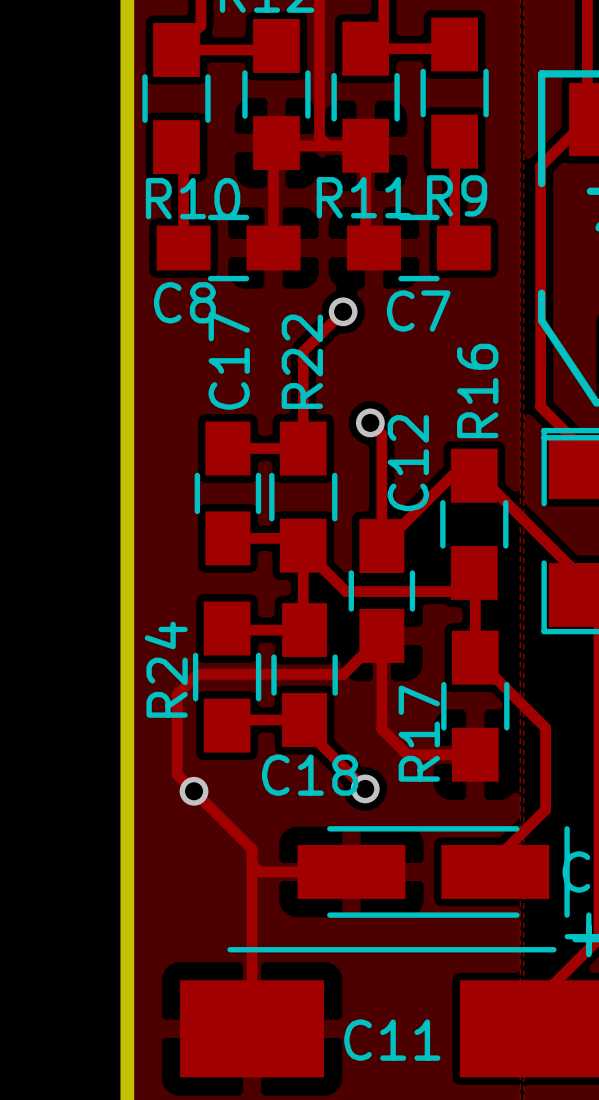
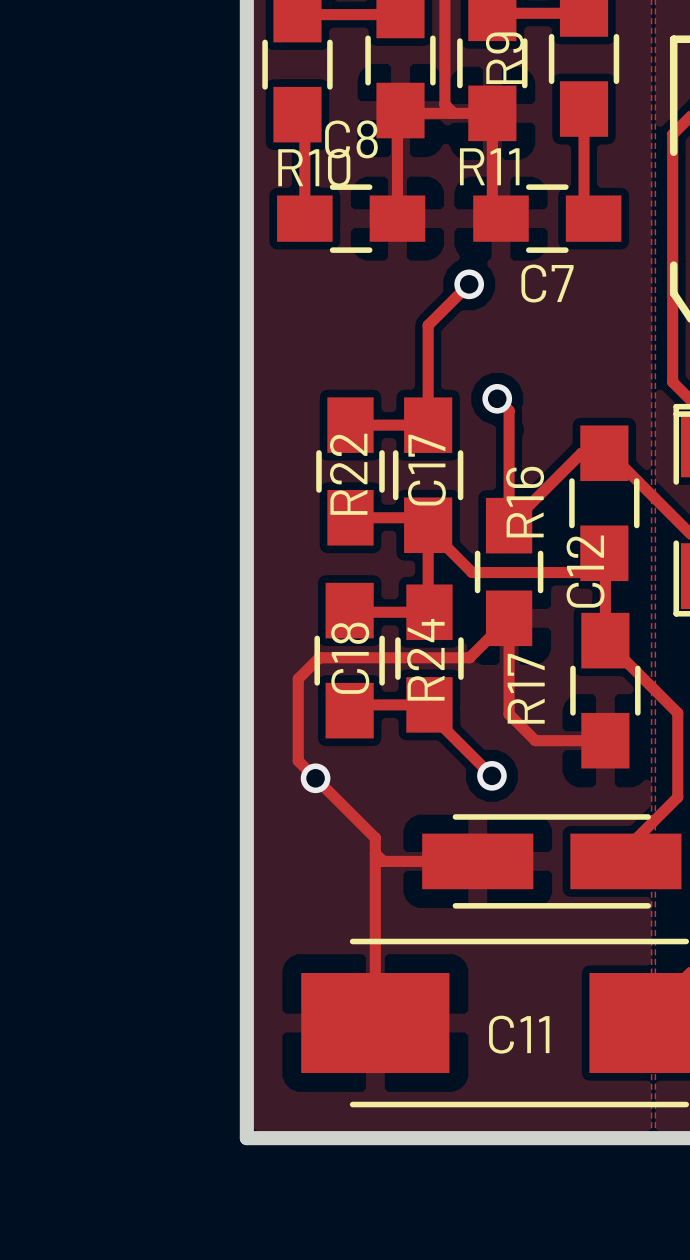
R9 name rotation: 0° (457, 195) -> 90° counterclockwise (504, 58)
R9 name position: R9 (457, 195) -> R9 (504, 58)
C8 name position: C8 (184, 302) -> C8 (351, 139)
C17 name position: C17 (229, 360) -> C17 (426, 470)
R22 name position: R22 (302, 361) -> R22 (348, 474)
R16 name position: R16 (477, 390) -> R16 (525, 502)
C12 name position: C12 (408, 463) -> C12 (585, 571)
R24 name position: R24 (166, 669) -> R24 (425, 659)
R17 name position: R17 (419, 733) -> R17 (526, 688)
C18 name rotation: 0° (310, 775) -> 90° counterclockwise (350, 658)
C18 name position: C18 (310, 775) -> C18 (350, 658)

